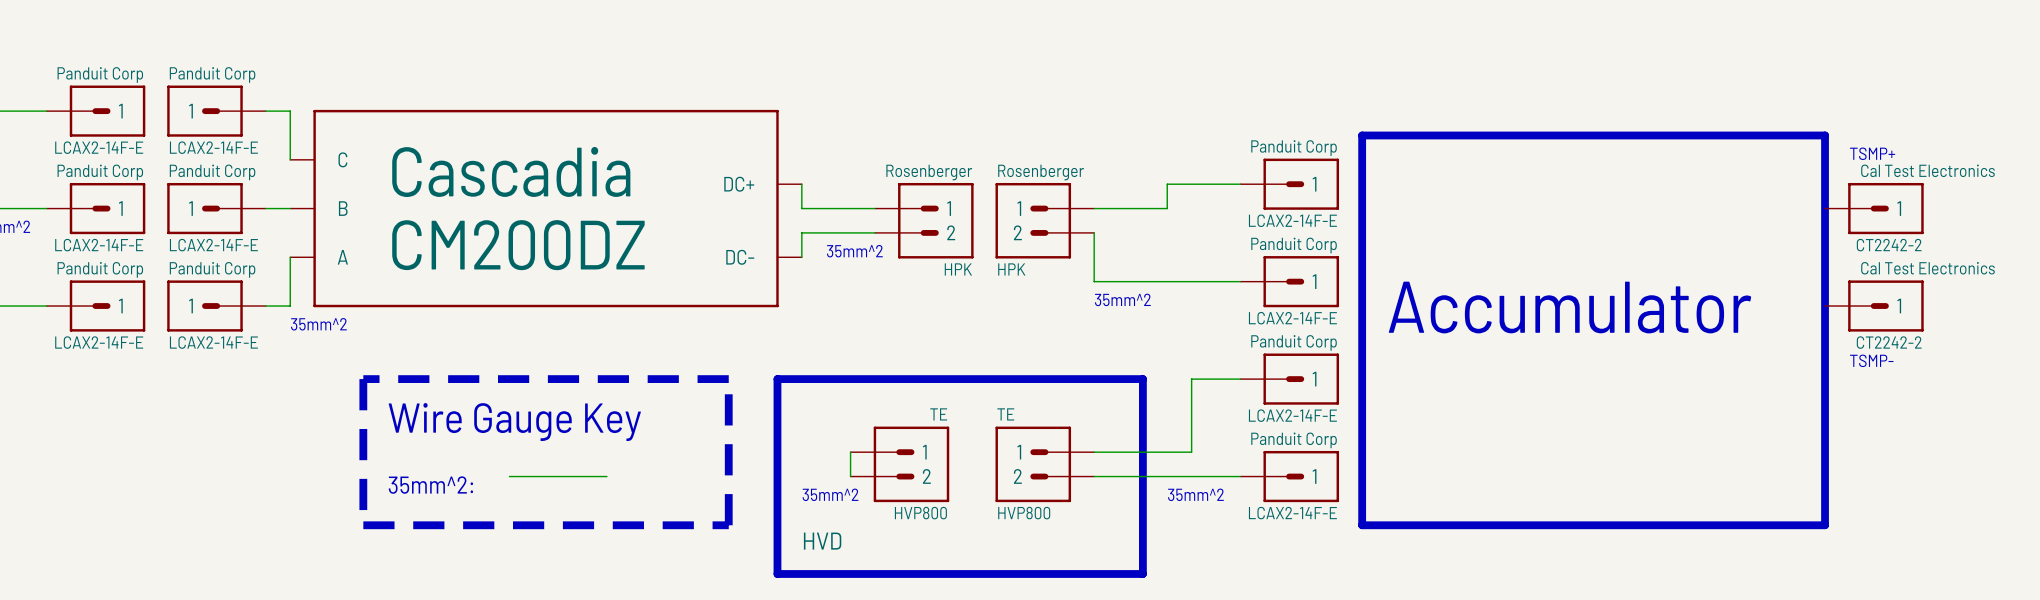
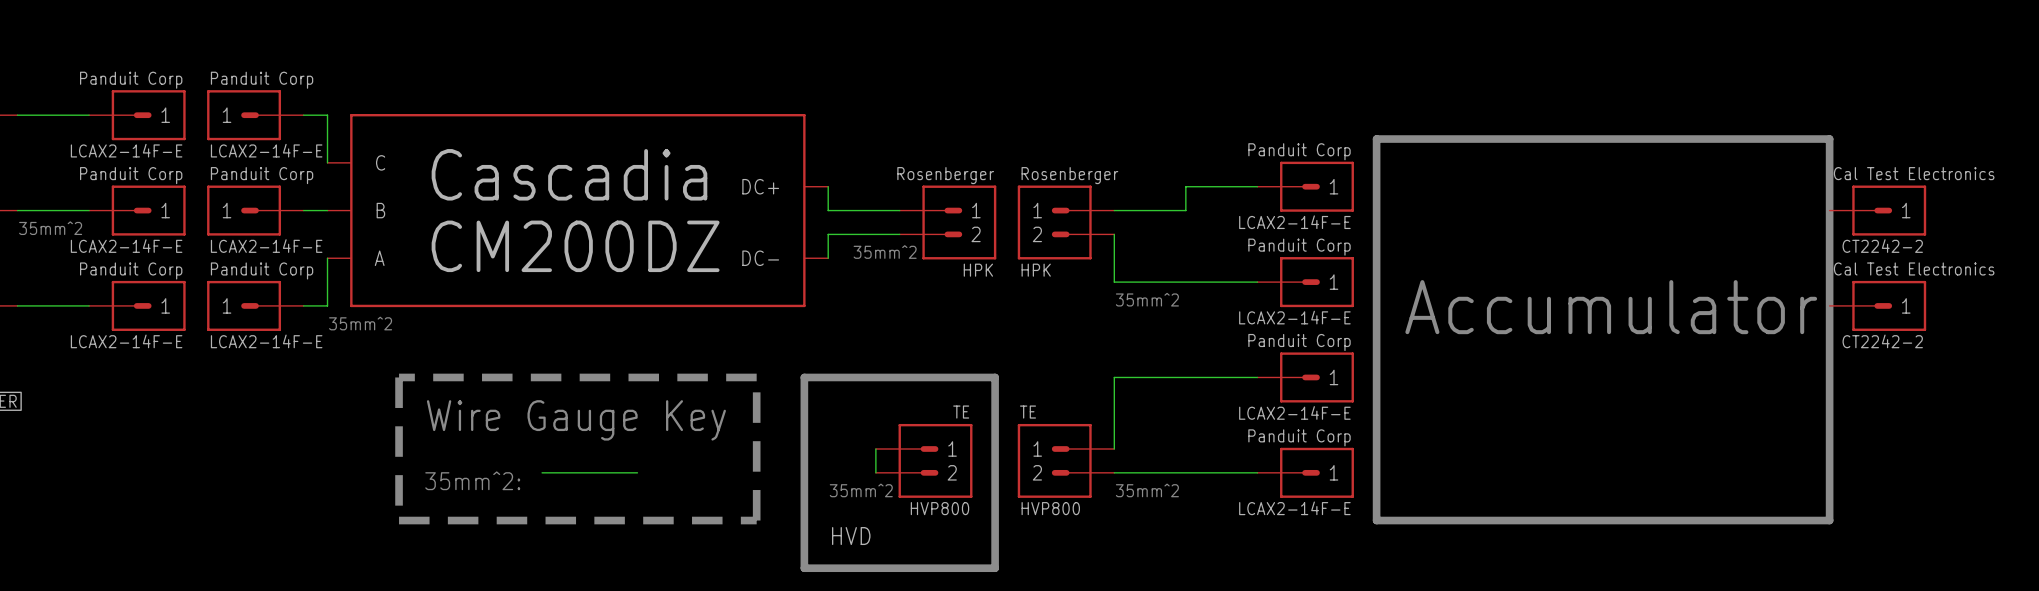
text: TSMP+ (1872, 153) -> none
text: TSMP- (1871, 360) -> none
line: (972, 379) (1142, 379) (1142, 573) (972, 573) -> (995, 377) (995, 568)
wire: (1191, 379) (1191, 452) (1094, 452) -> (1209, 377) (1114, 377) (1114, 448)
text position: 35mm^2 (1195, 494) -> 35mm^2 (1147, 490)

